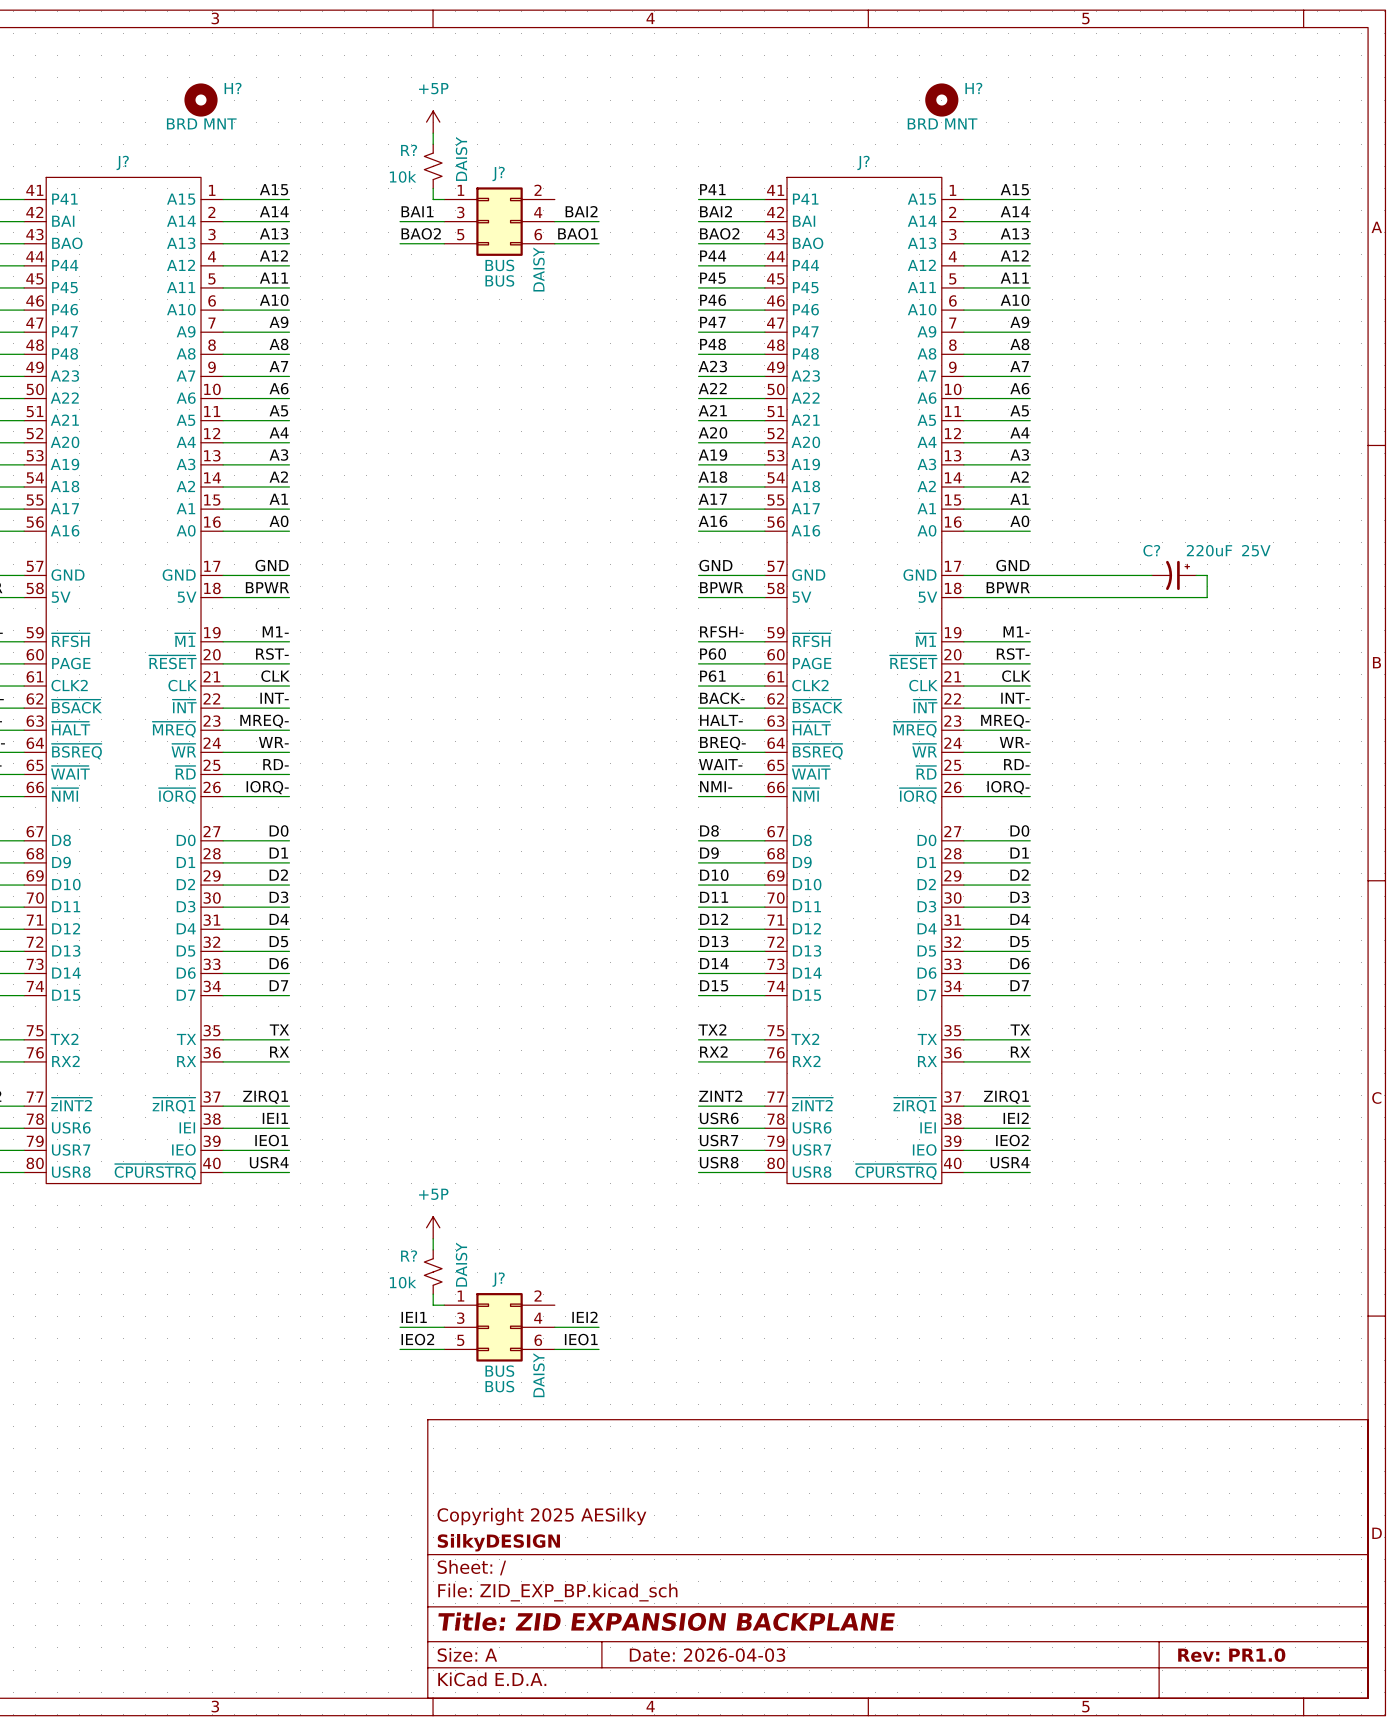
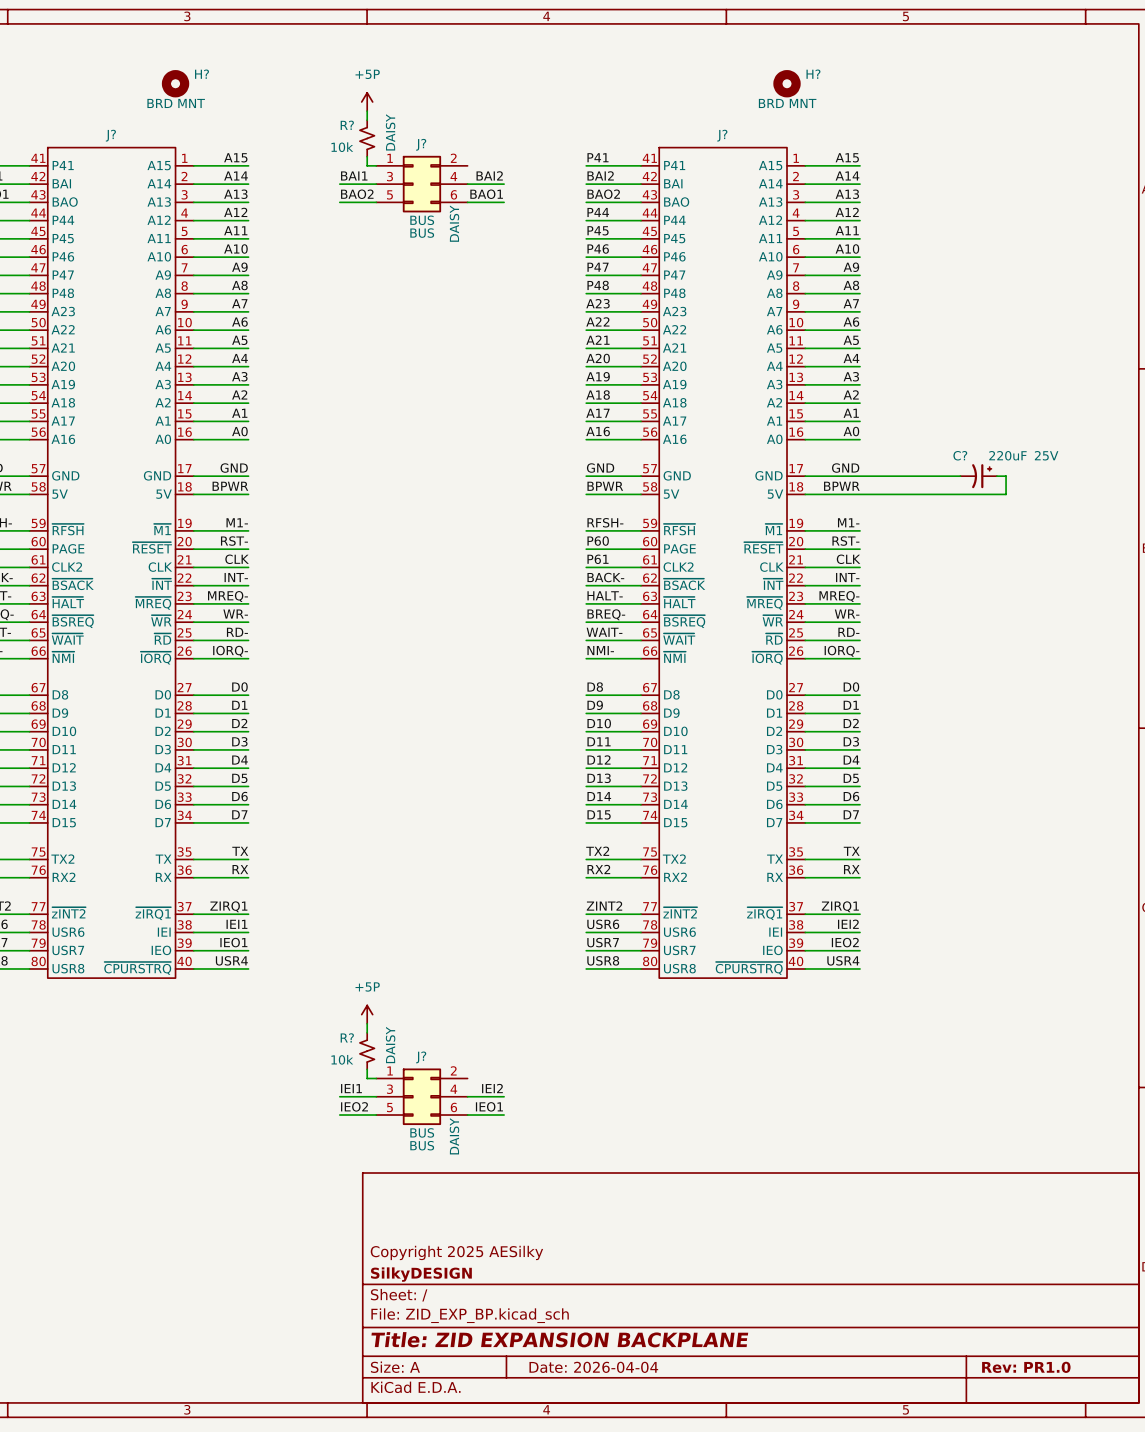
title block: Date: 2026-04-03 (707, 1655) -> Date: 2026-04-04 (593, 1367)

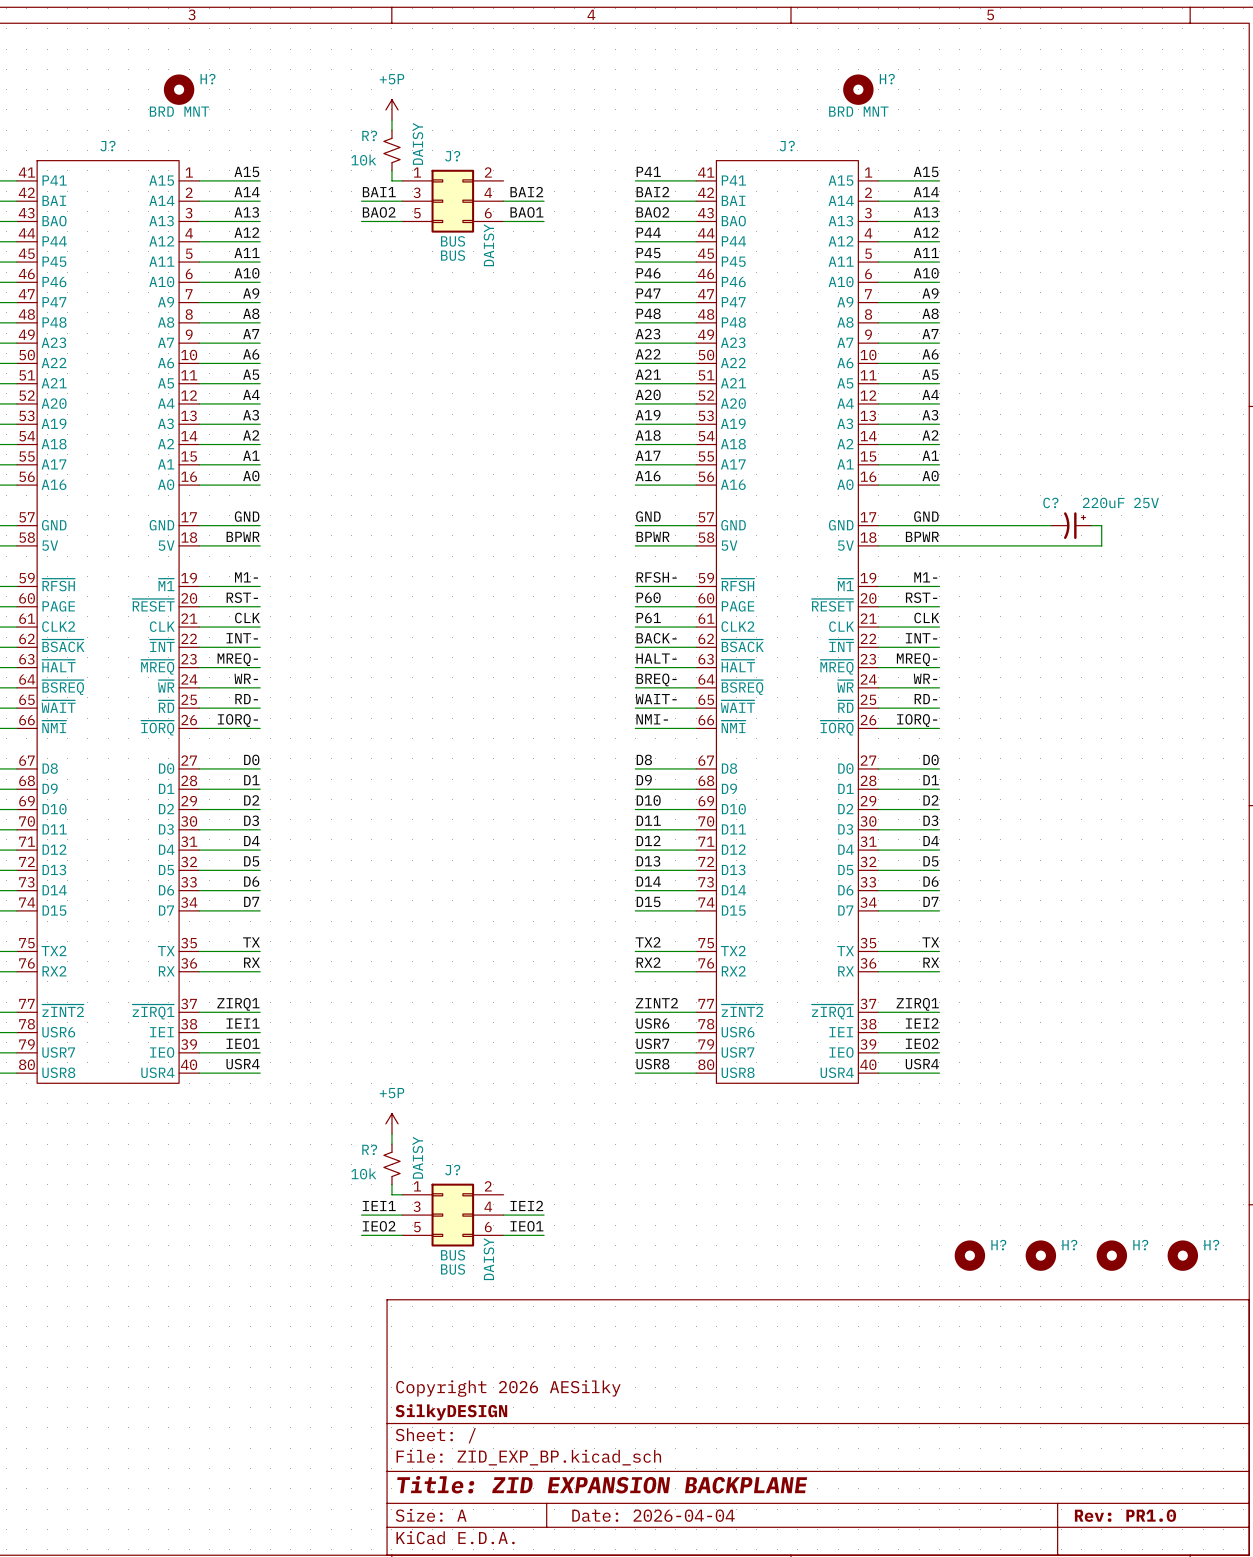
J? pin name: ~{CPURSTRQ} (137, 968) -> USR4 (157, 1072)
J? pin name: ~{CPURSTRQ} (749, 968) -> USR4 (837, 1072)
H?: none -> (969, 1255)
H?: none -> (1040, 1255)
H?: none -> (1111, 1255)
H?: none -> (1182, 1255)
title block: Copyright 2025 AESilky (456, 1252) -> Copyright 2026 AESilky (508, 1388)

